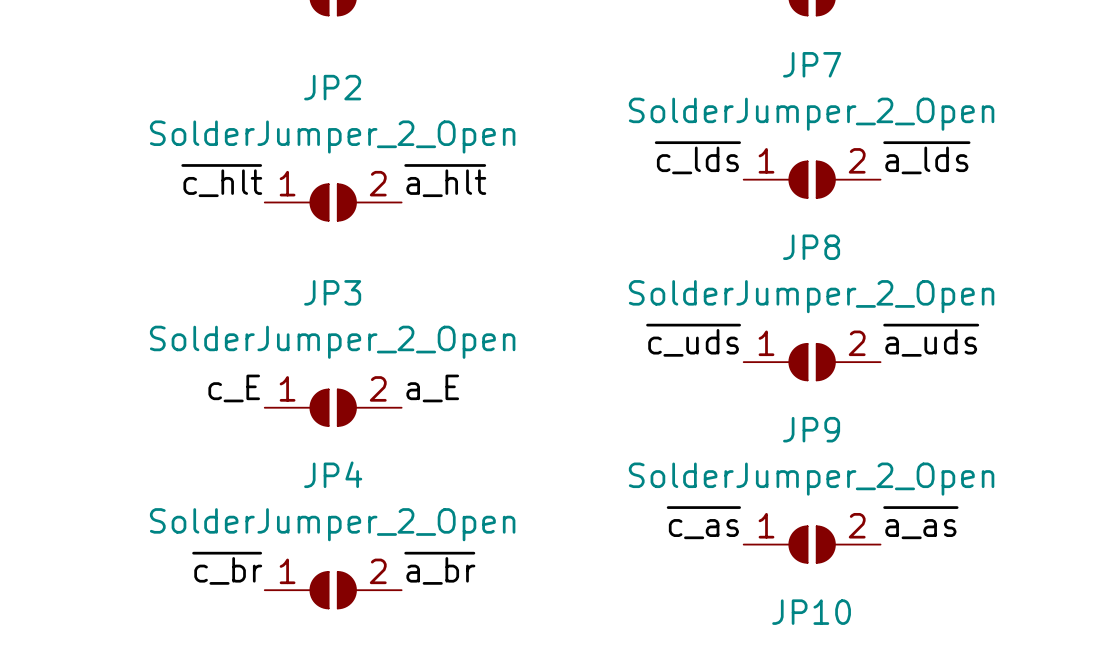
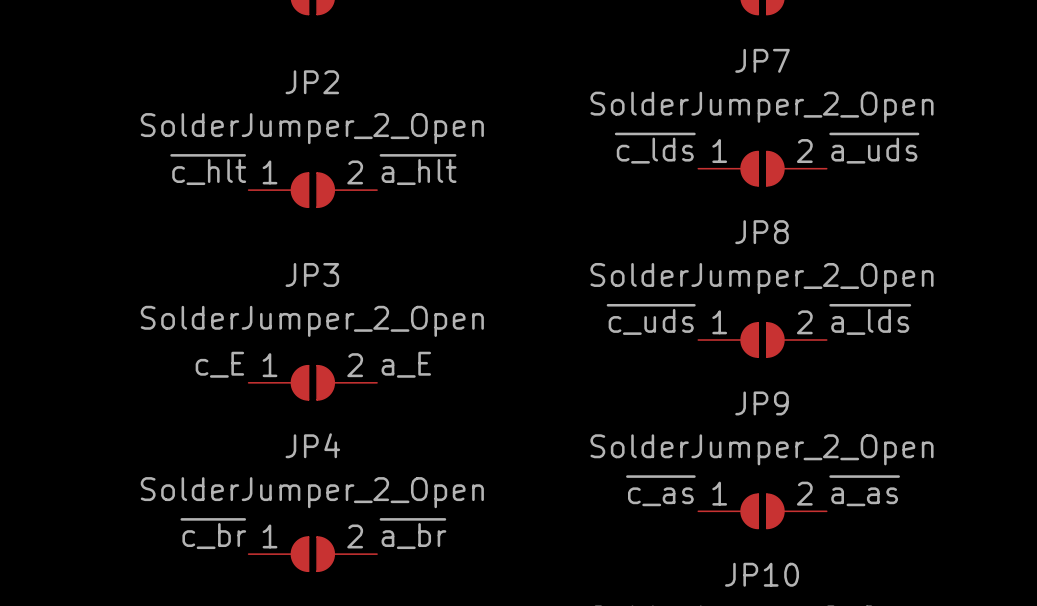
label: ~{a_lds} (926, 157) -> ~{a_uds} (874, 148)
label: ~{a_uds} (931, 340) -> ~{a_lds} (870, 319)

